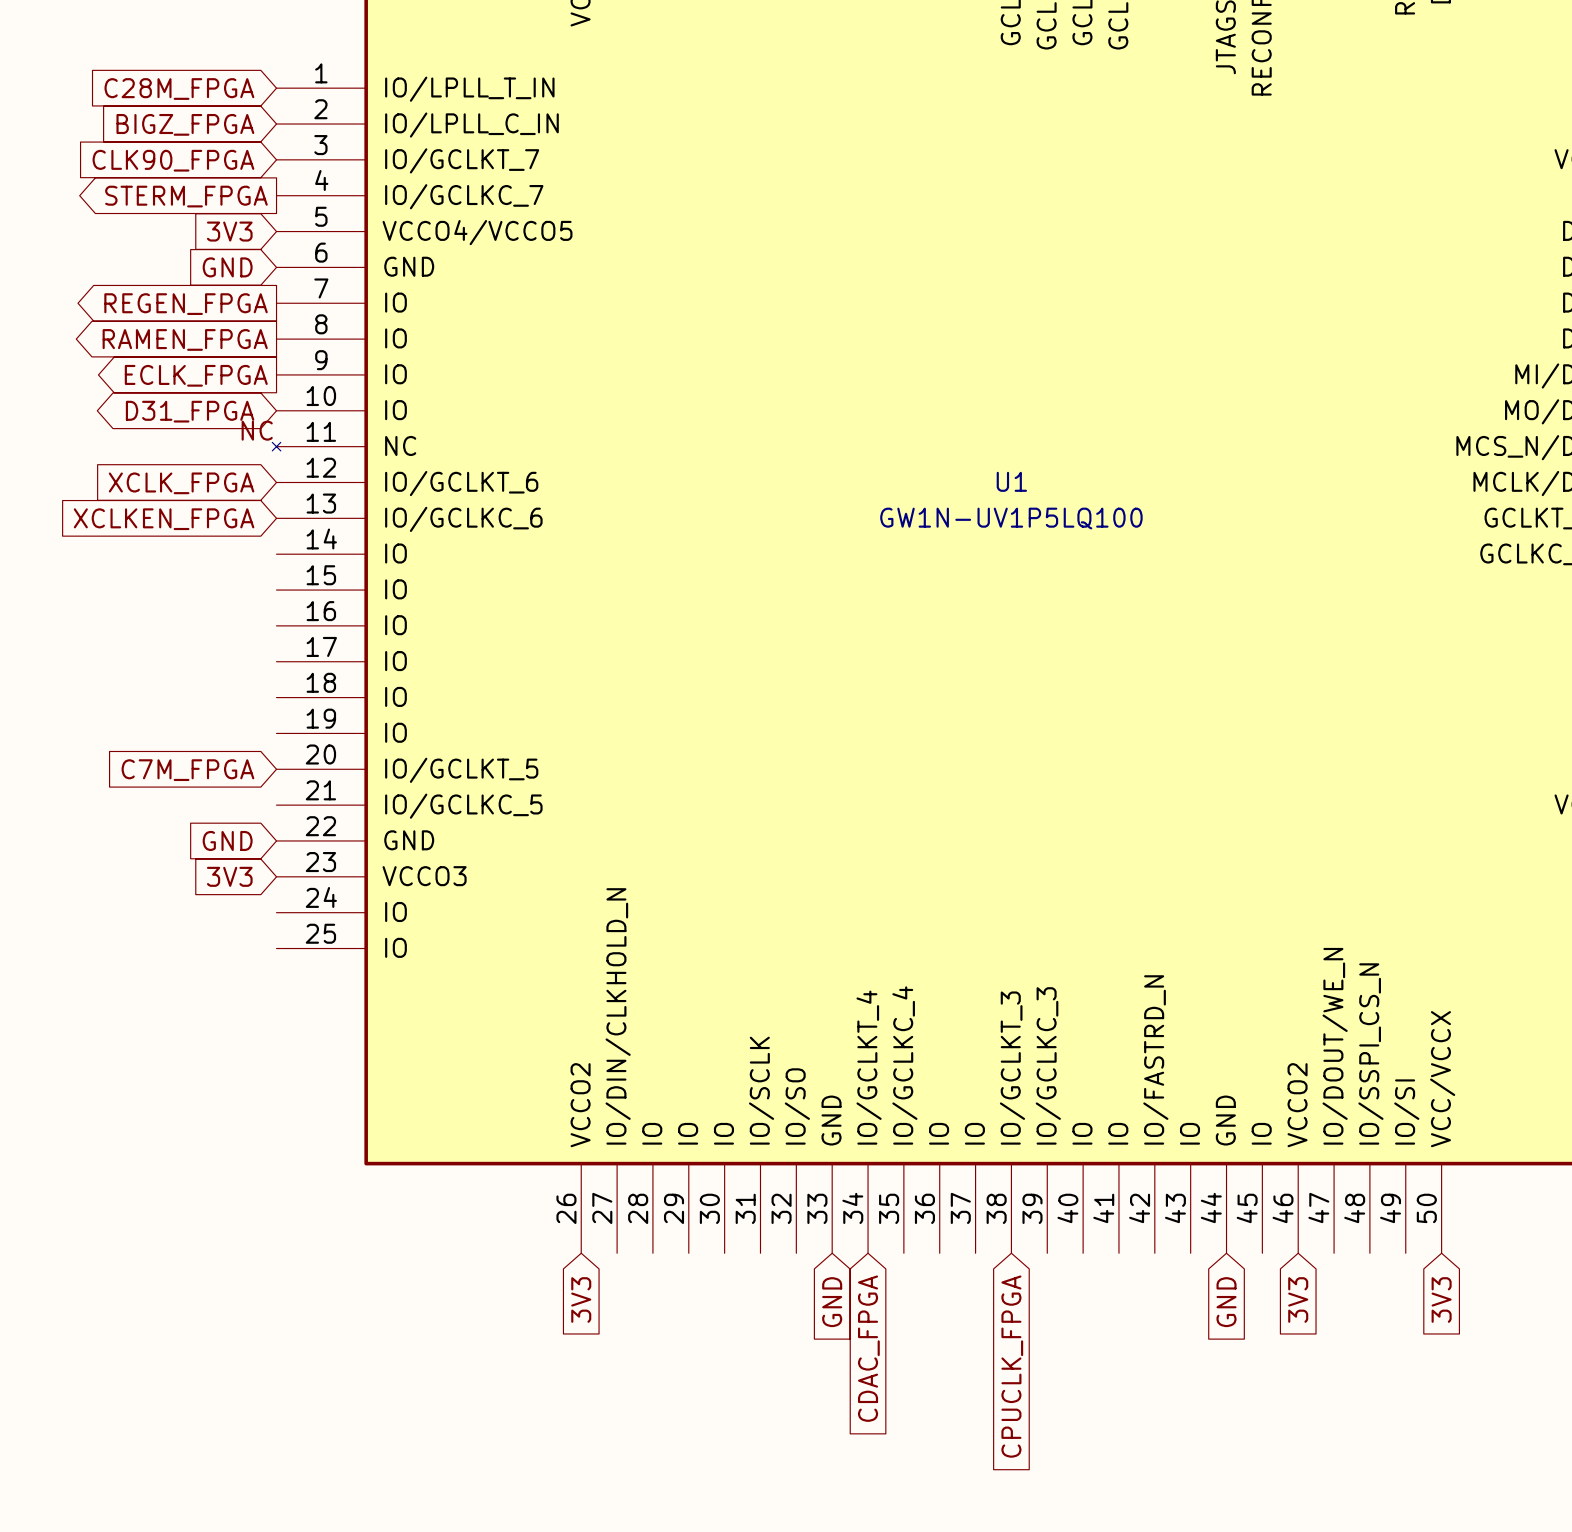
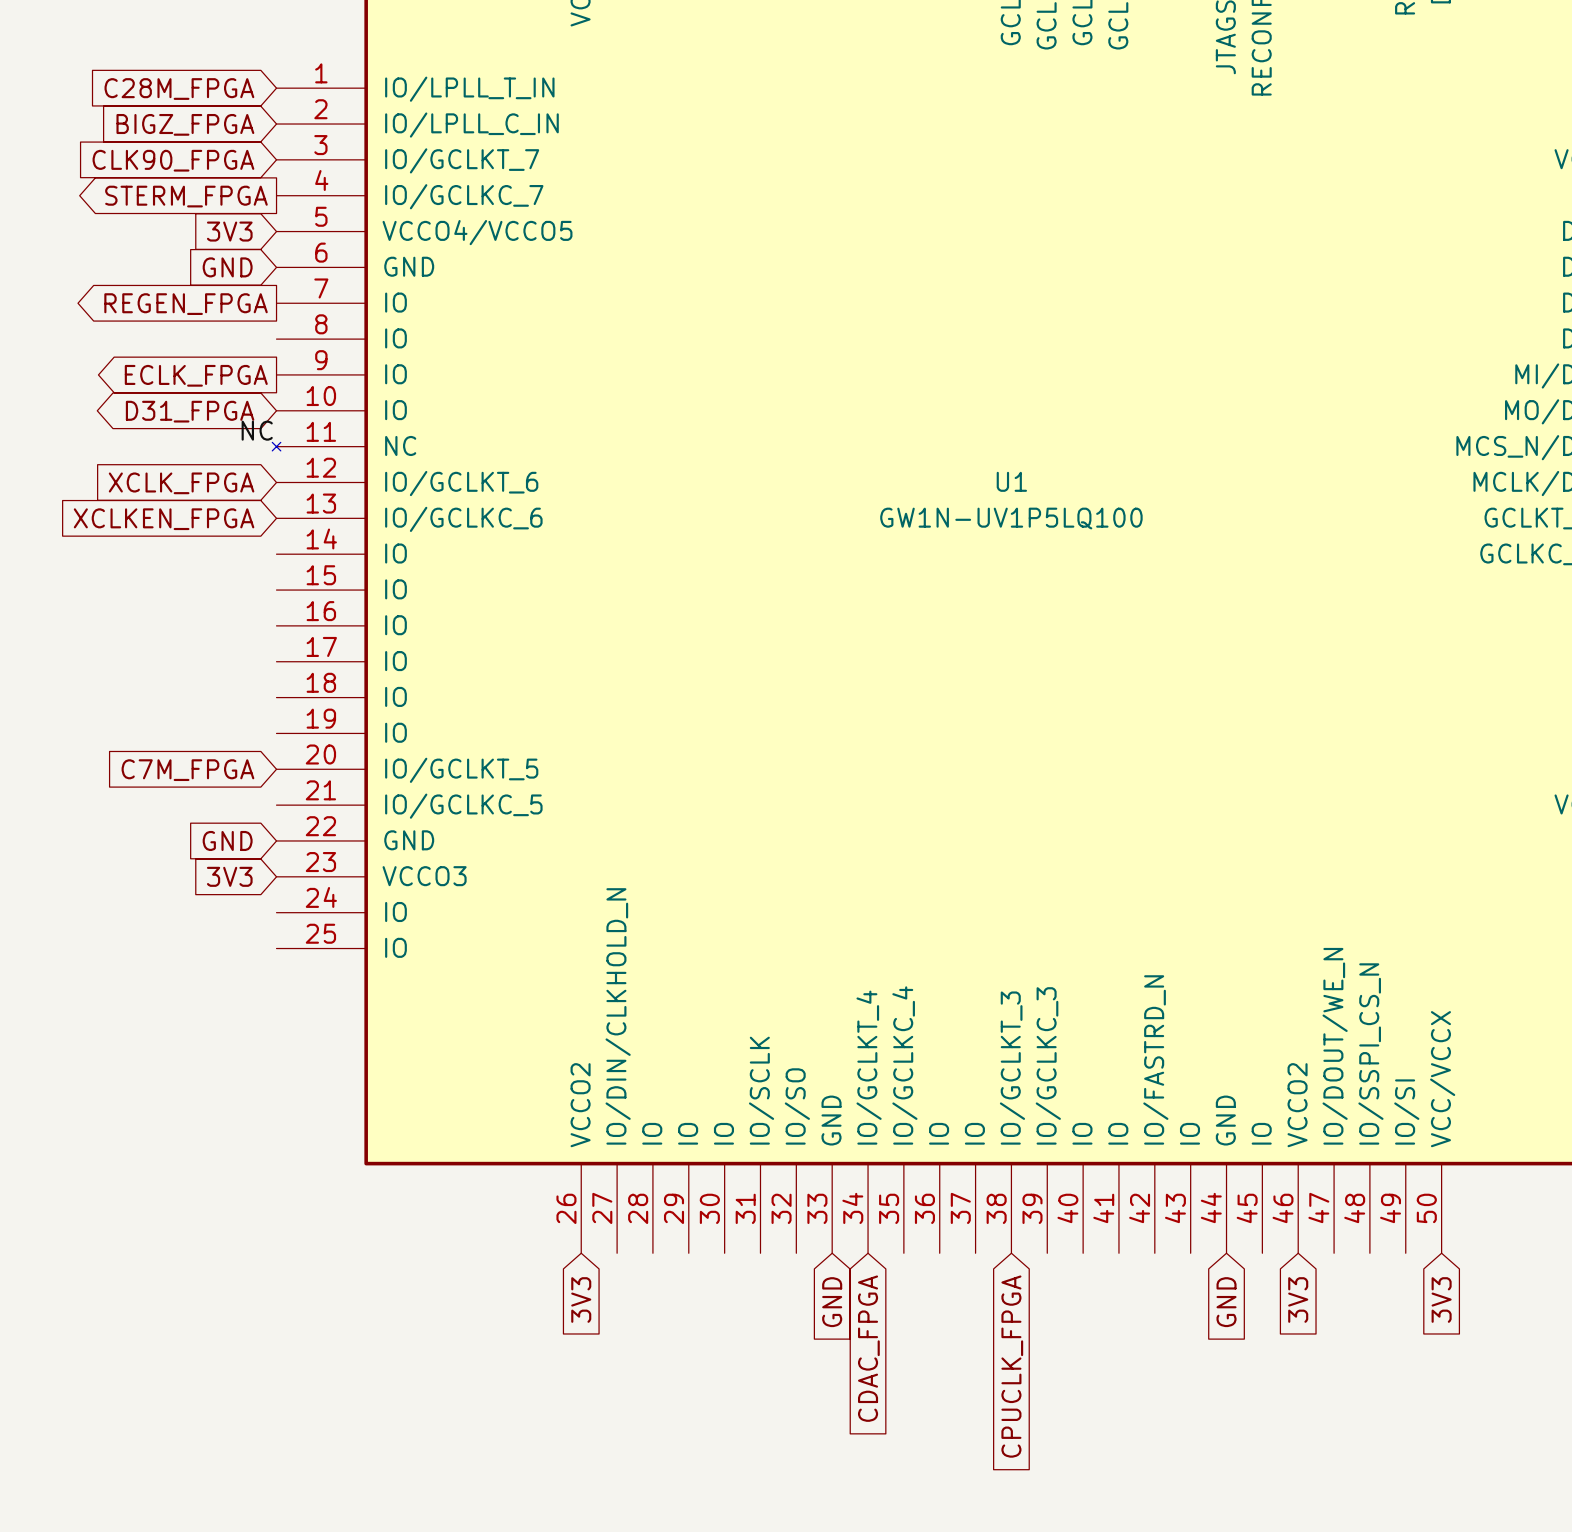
global label: RAMEN_FPGA (185, 339) -> none

